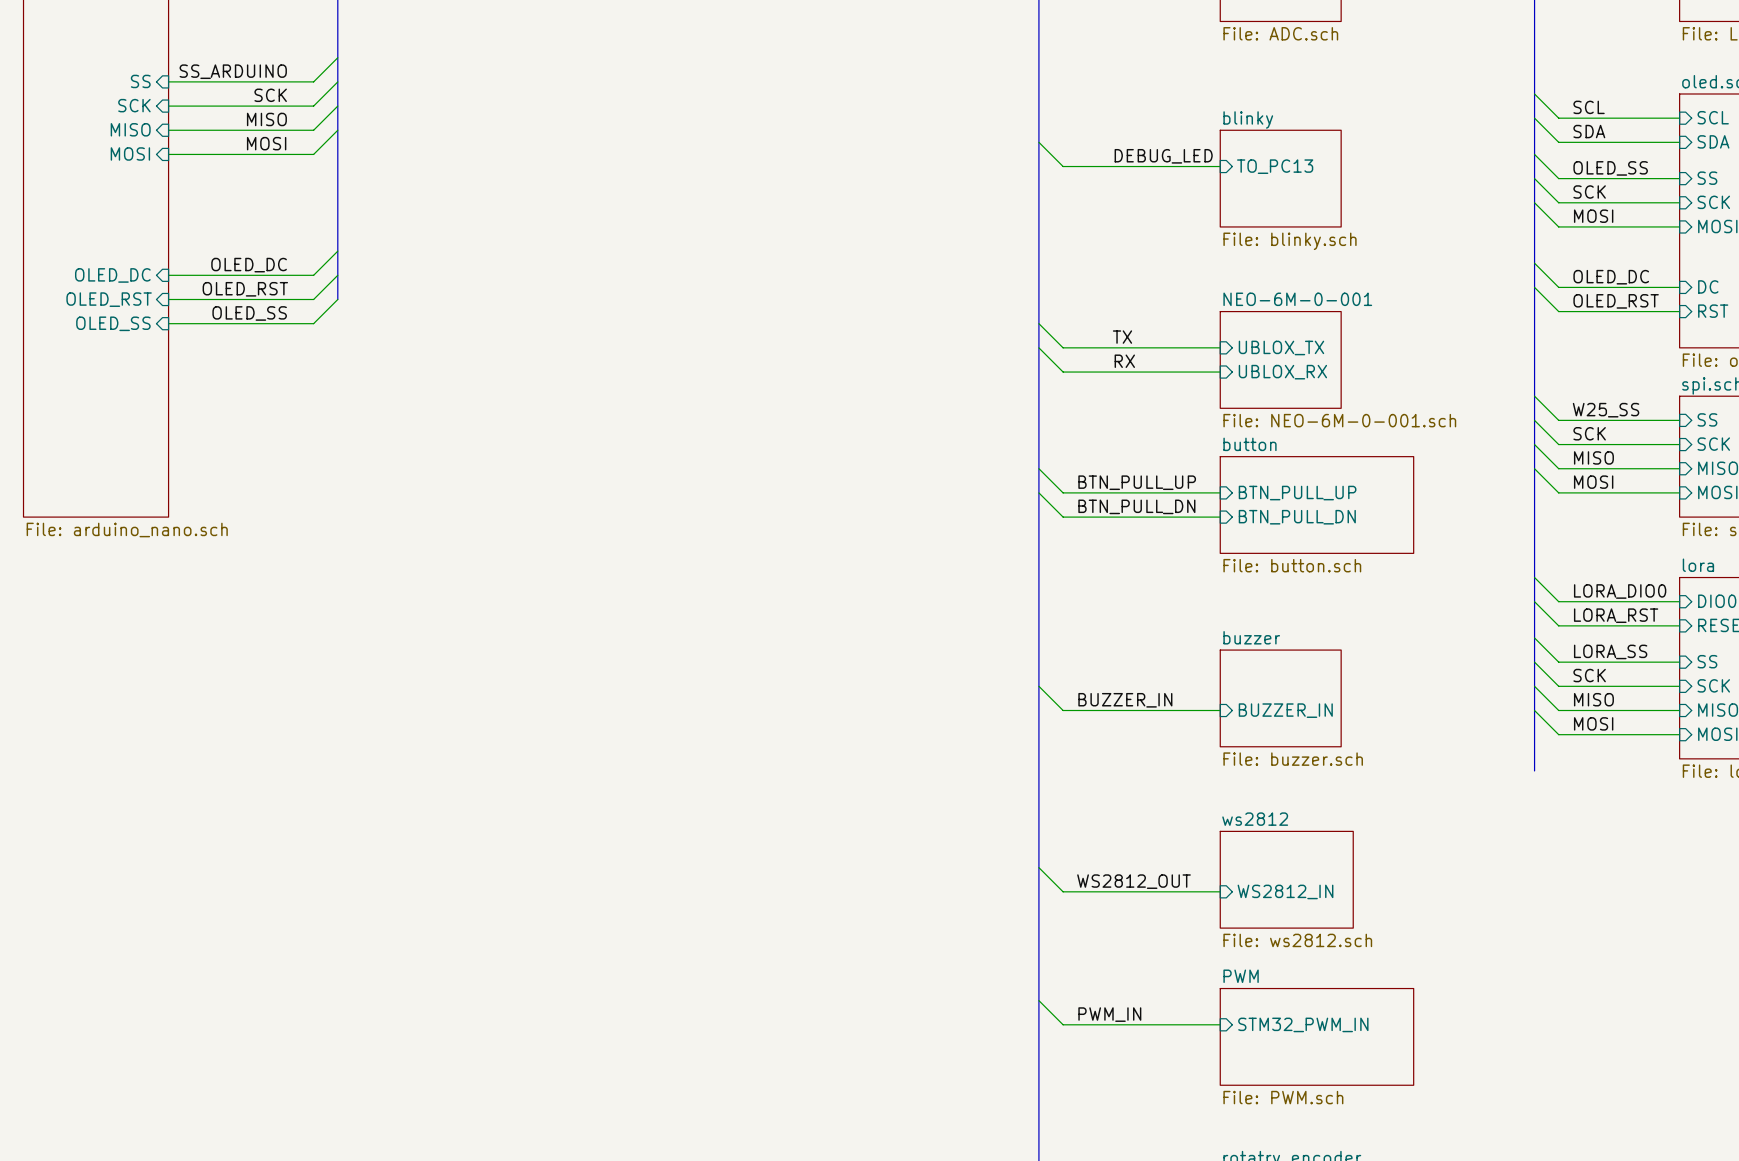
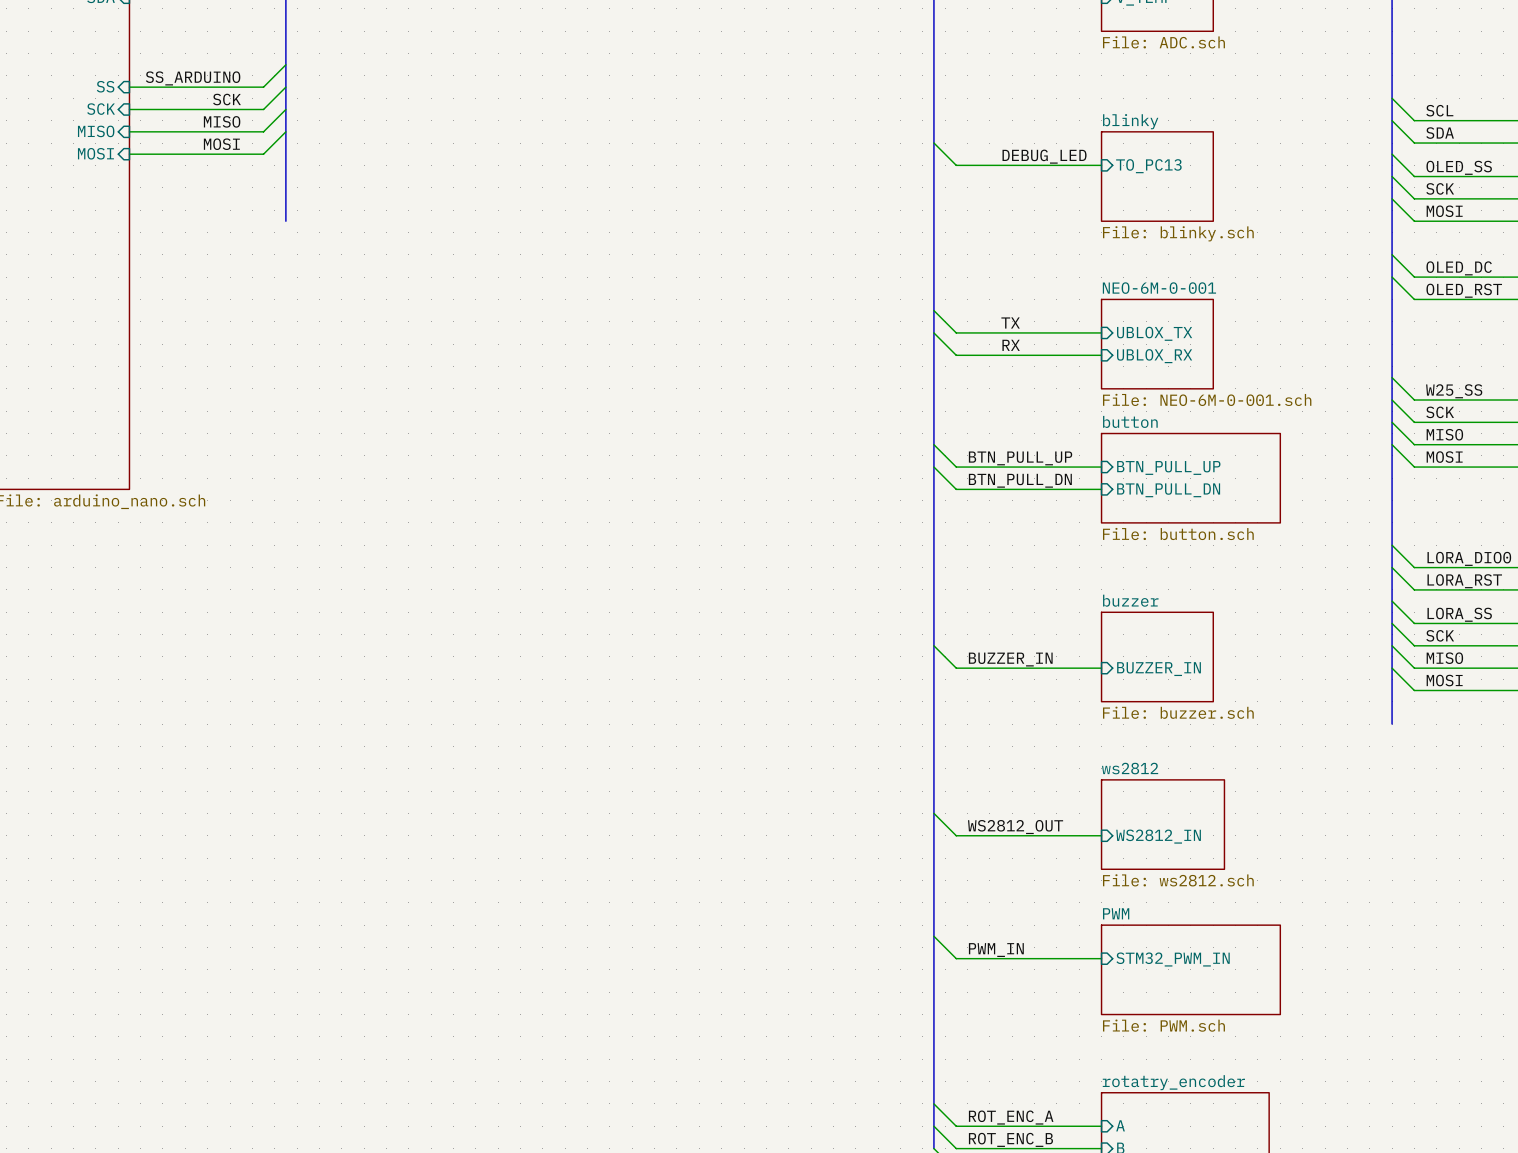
bus: (337, 226) (337, 299) -> none
wire: (337, 251) (313, 275) (168, 275) -> none
label: OLED_DC (249, 265) -> none
sheet pin: OLED_DC (112, 275) -> none
wire: (337, 275) (313, 299) (168, 299) -> none
label: OLED_RST (245, 289) -> none
sheet pin: OLED_RST (109, 299) -> none
wire: (337, 299) (313, 323) (168, 323) -> none
label: OLED_SS (249, 313) -> none
sheet pin: OLED_SS (113, 323) -> none

